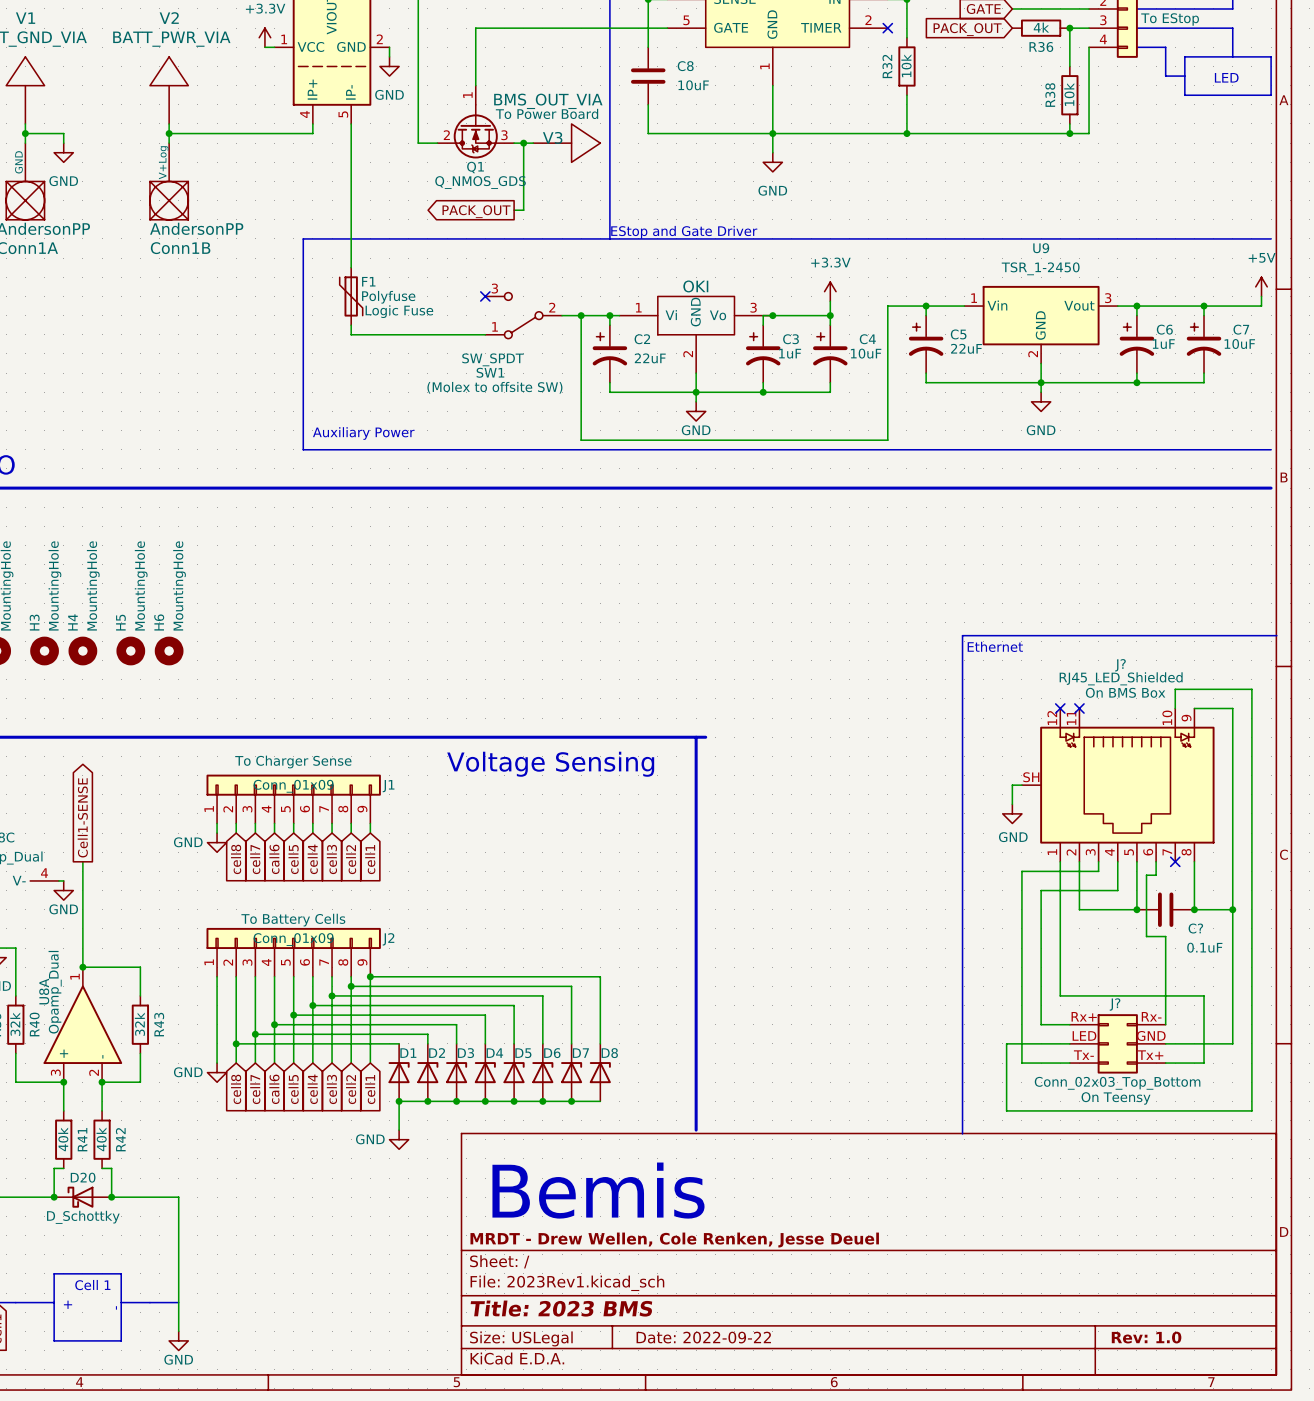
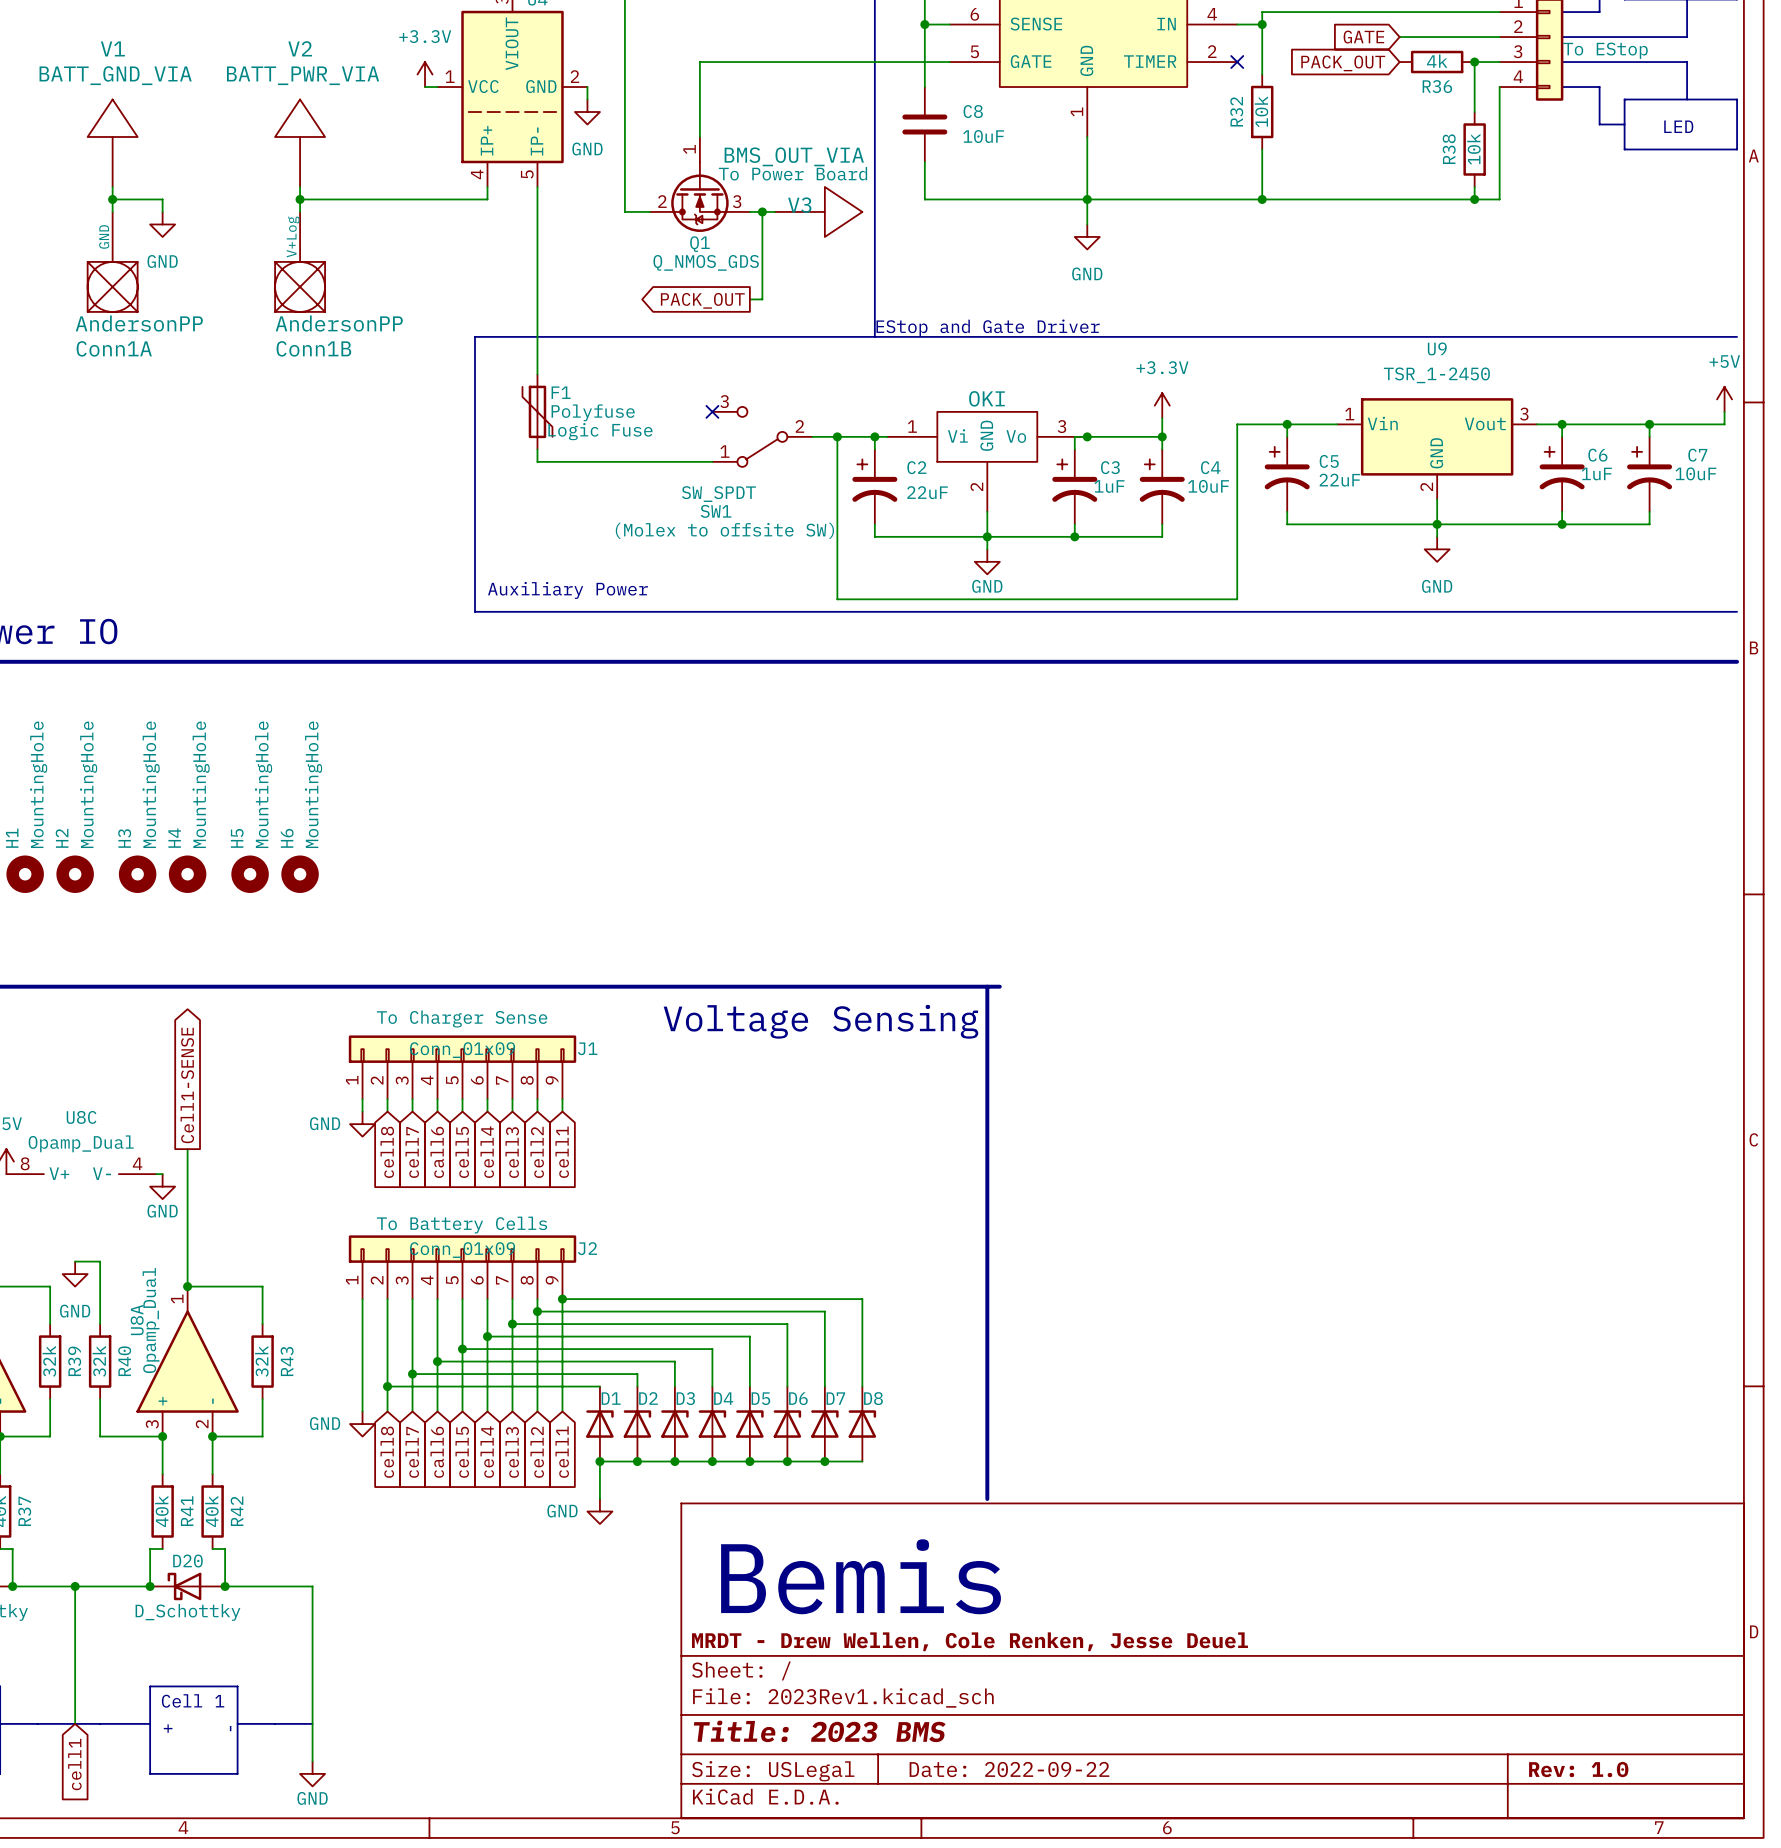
line: (1276, 635) (962, 635) (962, 1133) -> none
text: Ethernet (995, 646) -> none
no-connect mark: (1060, 708) -> none
no-connect mark: (1079, 708) -> none
wire: (1175, 708) (1175, 689) (1251, 689) (1251, 1110) (1006, 1110) (1006, 1043) (1069, 1043) -> none
wire: (1194, 708) (1232, 708) (1232, 1043) (1165, 1043) -> none
wire: (1021, 785) (1012, 785) (1012, 804) -> none
J?: RJ45_LED_Shielded (1118, 785) -> none
power symbol: GND (1012, 813) -> none
wire: (1060, 861) (1060, 995) (1204, 995) (1204, 1063) (1165, 1063) -> none
wire: (1079, 861) (1079, 909) (1136, 909) (1136, 861) -> none
wire: (1098, 861) (1098, 871) (1021, 871) (1021, 1063) (1069, 1063) -> none
wire: (1117, 861) (1117, 890) (1041, 890) (1041, 1024) (1069, 1024) -> none
wire: (1156, 861) (1156, 875) (1146, 875) (1146, 936) (1165, 936) (1165, 1024) -> none
no-connect mark: (1175, 861) -> none
wire: (1194, 861) (1194, 909) (1232, 909) -> none
junction: (1136, 909) -> none
C?: 0.1uF (1165, 909) -> none
junction: (1194, 909) -> none
junction: (1232, 909) -> none
J?: Conn_02x03_Top_Bottom (1117, 1043) -> none

